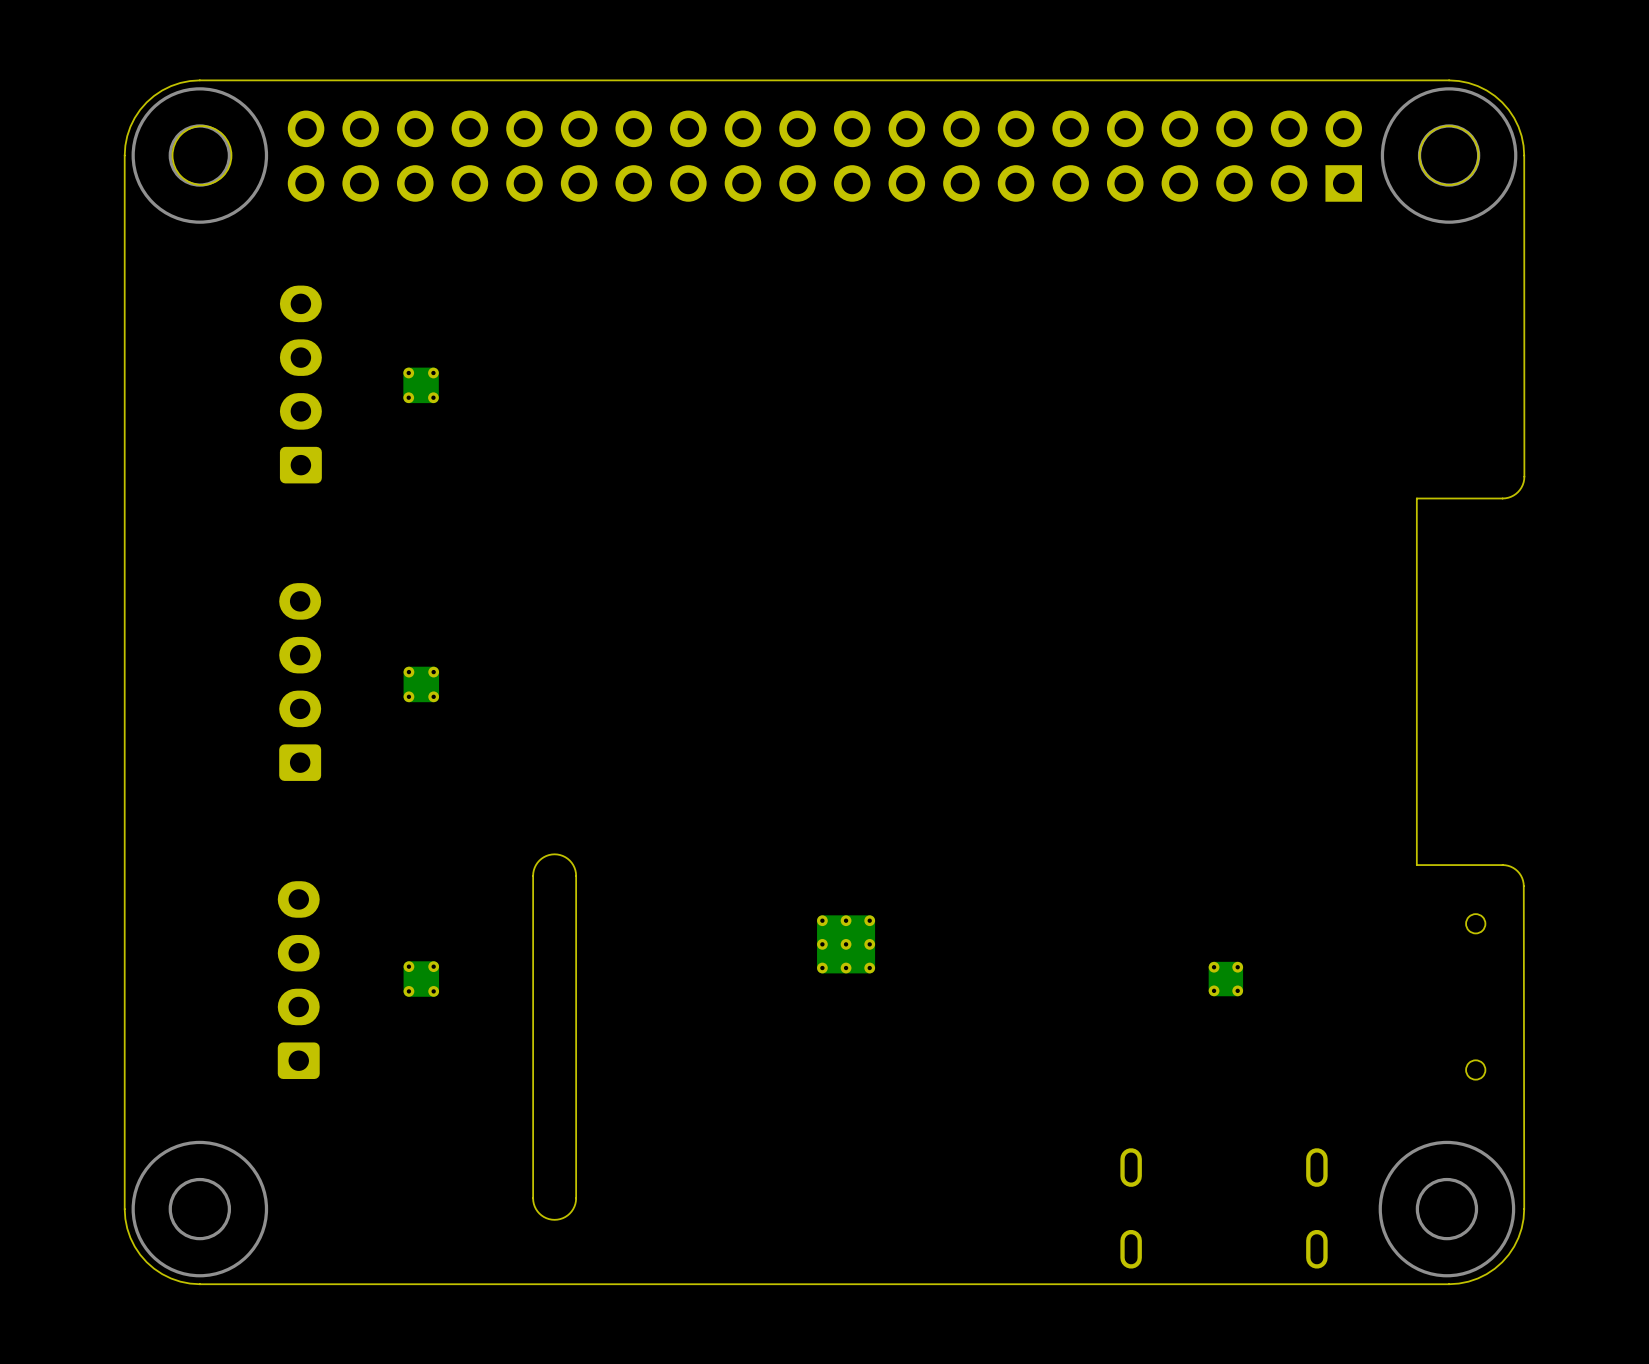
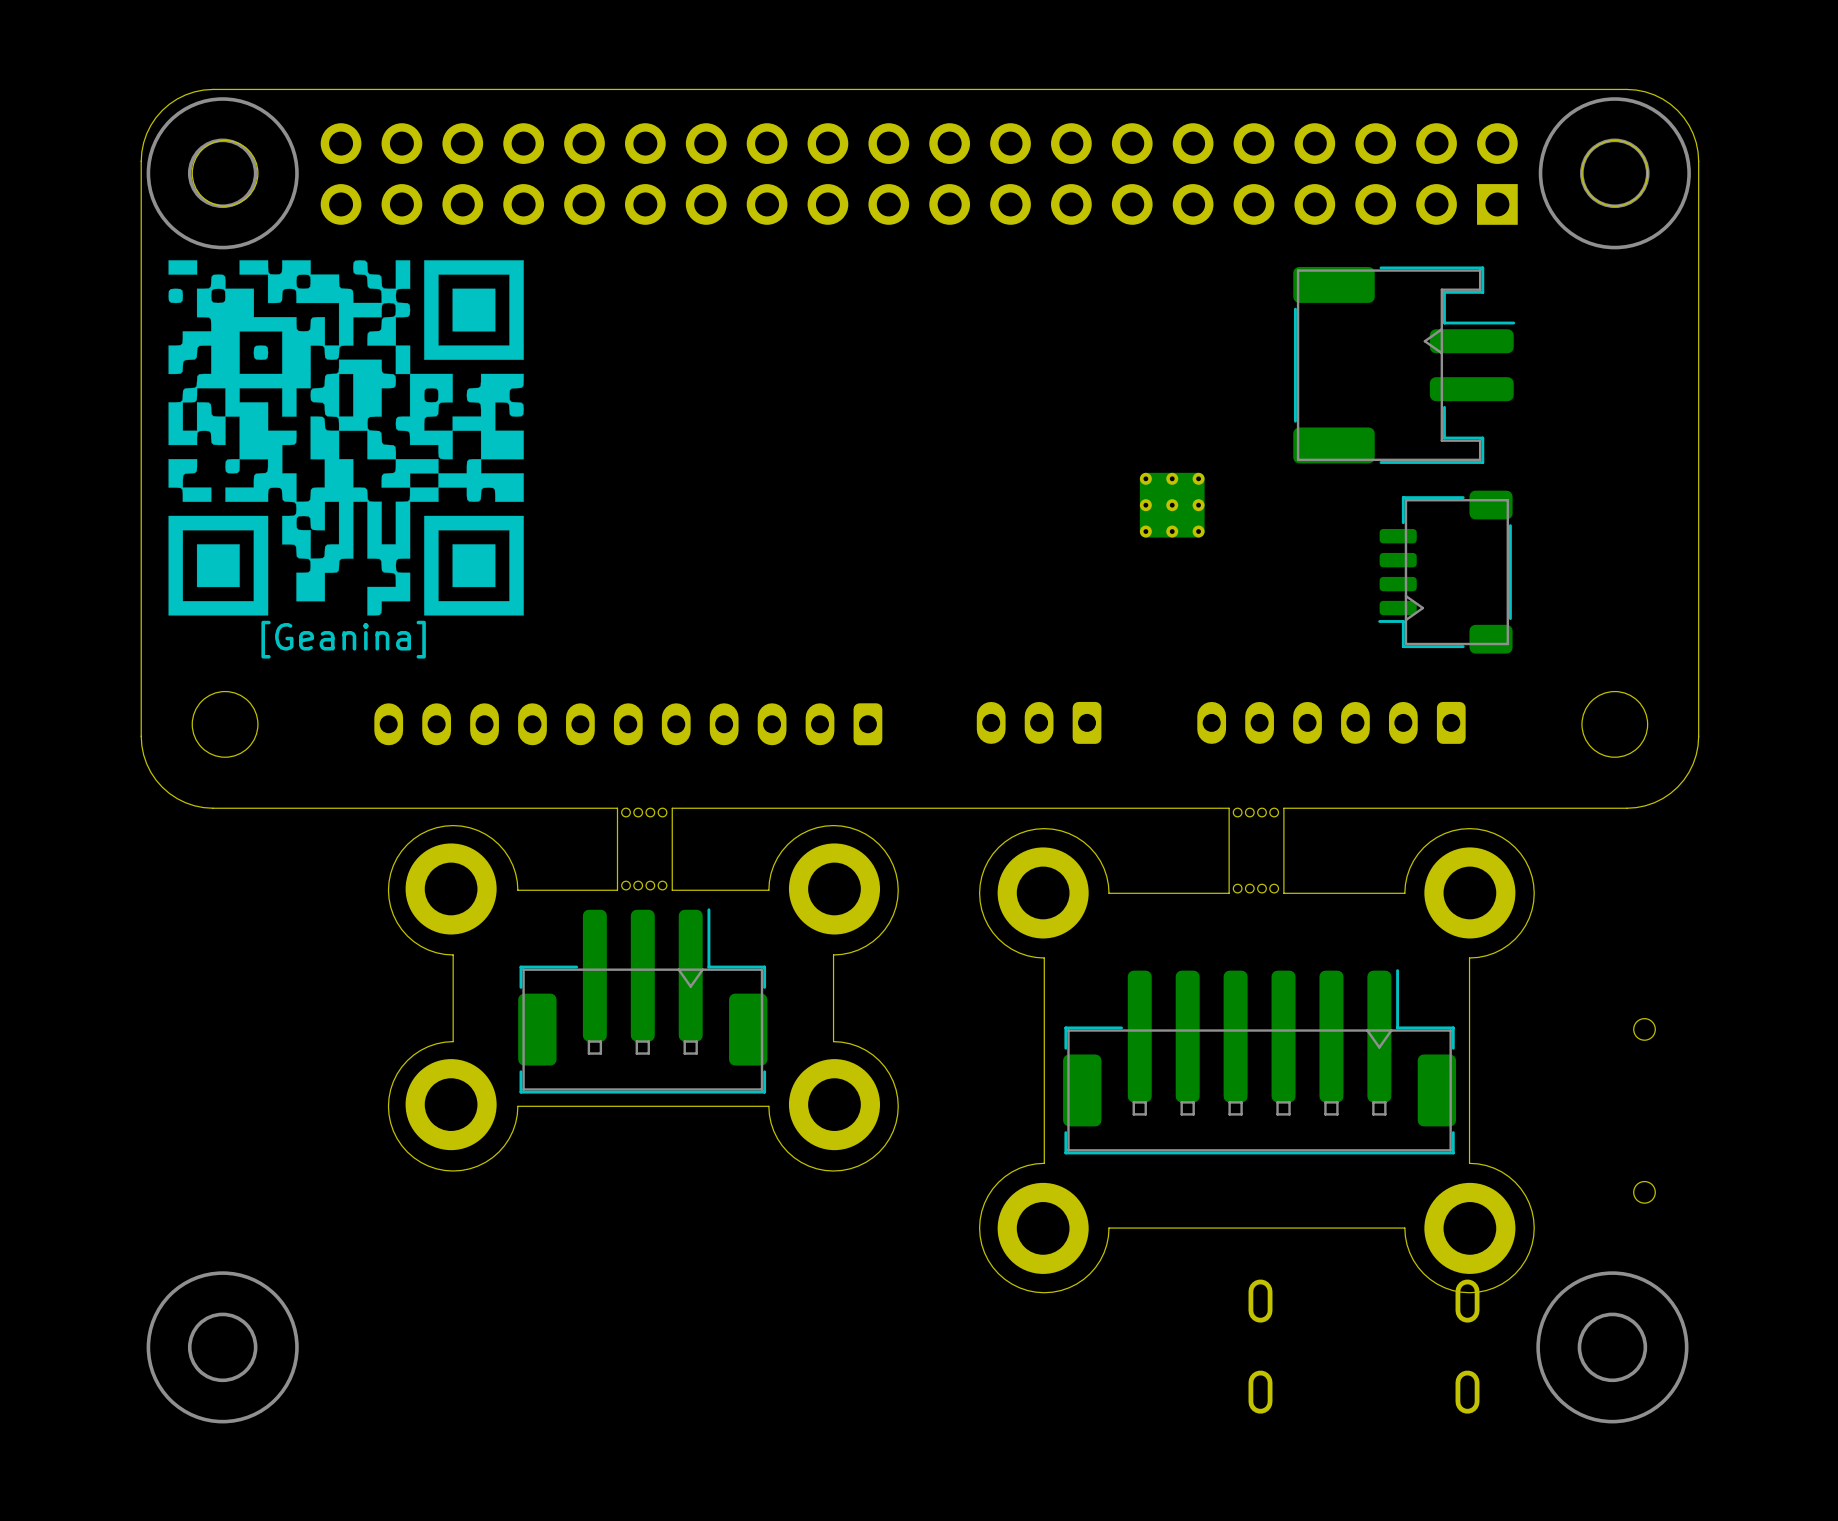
board edge: (1449, 80) (199, 80) (171, 86) (146, 102) (130, 126) (124, 155) (124, 1209) (130, 1237) (146, 1262) (171, 1278) (199, 1284) (1449, 1284) (1477, 1278) (1502, 1262) (1518, 1237) (1524, 1209) (1523, 883) (1517, 871) (1505, 865) (1416, 865) (1416, 498) (1505, 498) (1515, 494) (1523, 482) (1524, 155) (1518, 126) (1502, 102) (1477, 86) (1449, 80) -> (1626, 89) (1654, 94) (1677, 110) (1689, 125) (1698, 151) (1698, 736) (1693, 763) (1683, 780) (1670, 793) (1654, 802) (1636, 807) (1283, 808) (1283, 893) (1404, 893) (1409, 868) (1423, 847) (1437, 837) (1461, 829) (1486, 830) (1501, 837) (1515, 847) (1529, 868) (1533, 884) (1533, 901) (1525, 925) (1515, 939) (1501, 949) (1486, 955) (1469, 958) (1469, 1163) (1494, 1168) (1508, 1176) (1525, 1195) (1533, 1219) (1533, 1236) (1525, 1260) (1508, 1279) (1494, 1287) (1469, 1292) (1452, 1290) (1437, 1284) (1423, 1273) (1413, 1260) (1407, 1244) (1404, 1228) (1109, 1228) (1104, 1252) (1090, 1273) (1076, 1284) (1052, 1292) (1035, 1292) (1019, 1287) (1004, 1279) (988, 1260) (981, 1244) (979, 1228) (981, 1211) (988, 1195) (998, 1182) (1011, 1172) (1027, 1165) (1044, 1163) (1044, 958) (1027, 955) (1011, 949) (998, 939) (988, 925) (981, 910) (979, 893) (981, 876) (988, 860) (998, 847) (1019, 833) (1035, 829) (1052, 829) (1076, 837) (1090, 847) (1104, 868) (1109, 893) (1229, 893) (1229, 808) (672, 808) (672, 890) (768, 890) (773, 865) (787, 844) (801, 834) (825, 826) (841, 826) (858, 830) (879, 844) (889, 857) (896, 873) (898, 890) (896, 907) (889, 922) (879, 936) (865, 946) (850, 952) (833, 954) (833, 1041) (850, 1043) (865, 1050) (879, 1060) (889, 1073) (896, 1089) (898, 1106) (896, 1123) (889, 1138) (879, 1152) (858, 1166) (841, 1170) (825, 1170) (801, 1162) (787, 1152) (773, 1131) (768, 1106) (517, 1106) (512, 1131) (498, 1152) (477, 1166) (453, 1171) (428, 1166) (407, 1152) (393, 1131) (389, 1114) (389, 1097) (393, 1081) (407, 1060) (428, 1046) (453, 1041) (453, 954) (436, 952) (420, 946) (407, 936) (397, 922) (390, 907) (388, 890) (393, 865) (407, 844) (420, 834) (436, 827) (461, 826) (485, 834) (498, 844) (512, 865) (517, 890) (617, 890) (617, 808) (203, 807) (185, 802) (169, 793) (156, 780) (146, 763) (141, 736) (141, 161) (143, 142) (150, 125) (162, 110) (185, 94) (213, 89) (1626, 89)
drawing: none -> [168, 260, 524, 616]
part: none -> (1404, 365)
part: (300, 384) -> none
part: (421, 385) -> none
part: none -> (1445, 572)
text: none -> [Geanina] (343, 639)
round board edge: none -> [191, 690, 259, 758]
round board edge: none -> [1581, 690, 1649, 758]
part: none -> (1039, 722)
part: none -> (1331, 722)
part: none -> (628, 724)
part: (300, 682) -> none
part: (421, 684) -> none
round board edge: none -> [621, 807, 631, 818]
round board edge: none -> [633, 807, 644, 818]
round board edge: none -> [645, 807, 656, 818]
round board edge: none -> [657, 807, 668, 818]
round board edge: none -> [1232, 807, 1243, 818]
round board edge: none -> [1244, 807, 1255, 818]
round board edge: none -> [1257, 807, 1267, 818]
round board edge: none -> [1269, 807, 1280, 818]
round board edge: none -> [621, 880, 631, 891]
round board edge: none -> [633, 880, 644, 891]
round board edge: none -> [645, 880, 656, 891]
round board edge: none -> [657, 880, 668, 891]
round board edge: none -> [1232, 883, 1243, 894]
round board edge: none -> [1244, 883, 1255, 894]
round board edge: none -> [1257, 883, 1267, 894]
round board edge: none -> [1269, 883, 1280, 894]
part: none -> (451, 888)
part: none -> (834, 888)
part: none -> (1043, 892)
part: none -> (1469, 892)
board edge: (576, 875) (575, 1201) (573, 1209) (567, 1215) (560, 1219) (551, 1219) (539, 1213) (534, 1206) (533, 1198) (533, 873) (539, 860) (546, 855) (554, 854) (562, 855) (569, 860) (574, 867) (576, 875) -> none
part: none -> (642, 1000)
part position: (846, 944) -> (1172, 505)
part: none -> (1259, 1061)
part footprint: [403, 961, 440, 997] -> [405, 1059, 497, 1151]
part: (1225, 979) -> none
part: (298, 980) -> none
part: none -> (834, 1104)
part: none -> (1043, 1228)
part: none -> (1469, 1228)

